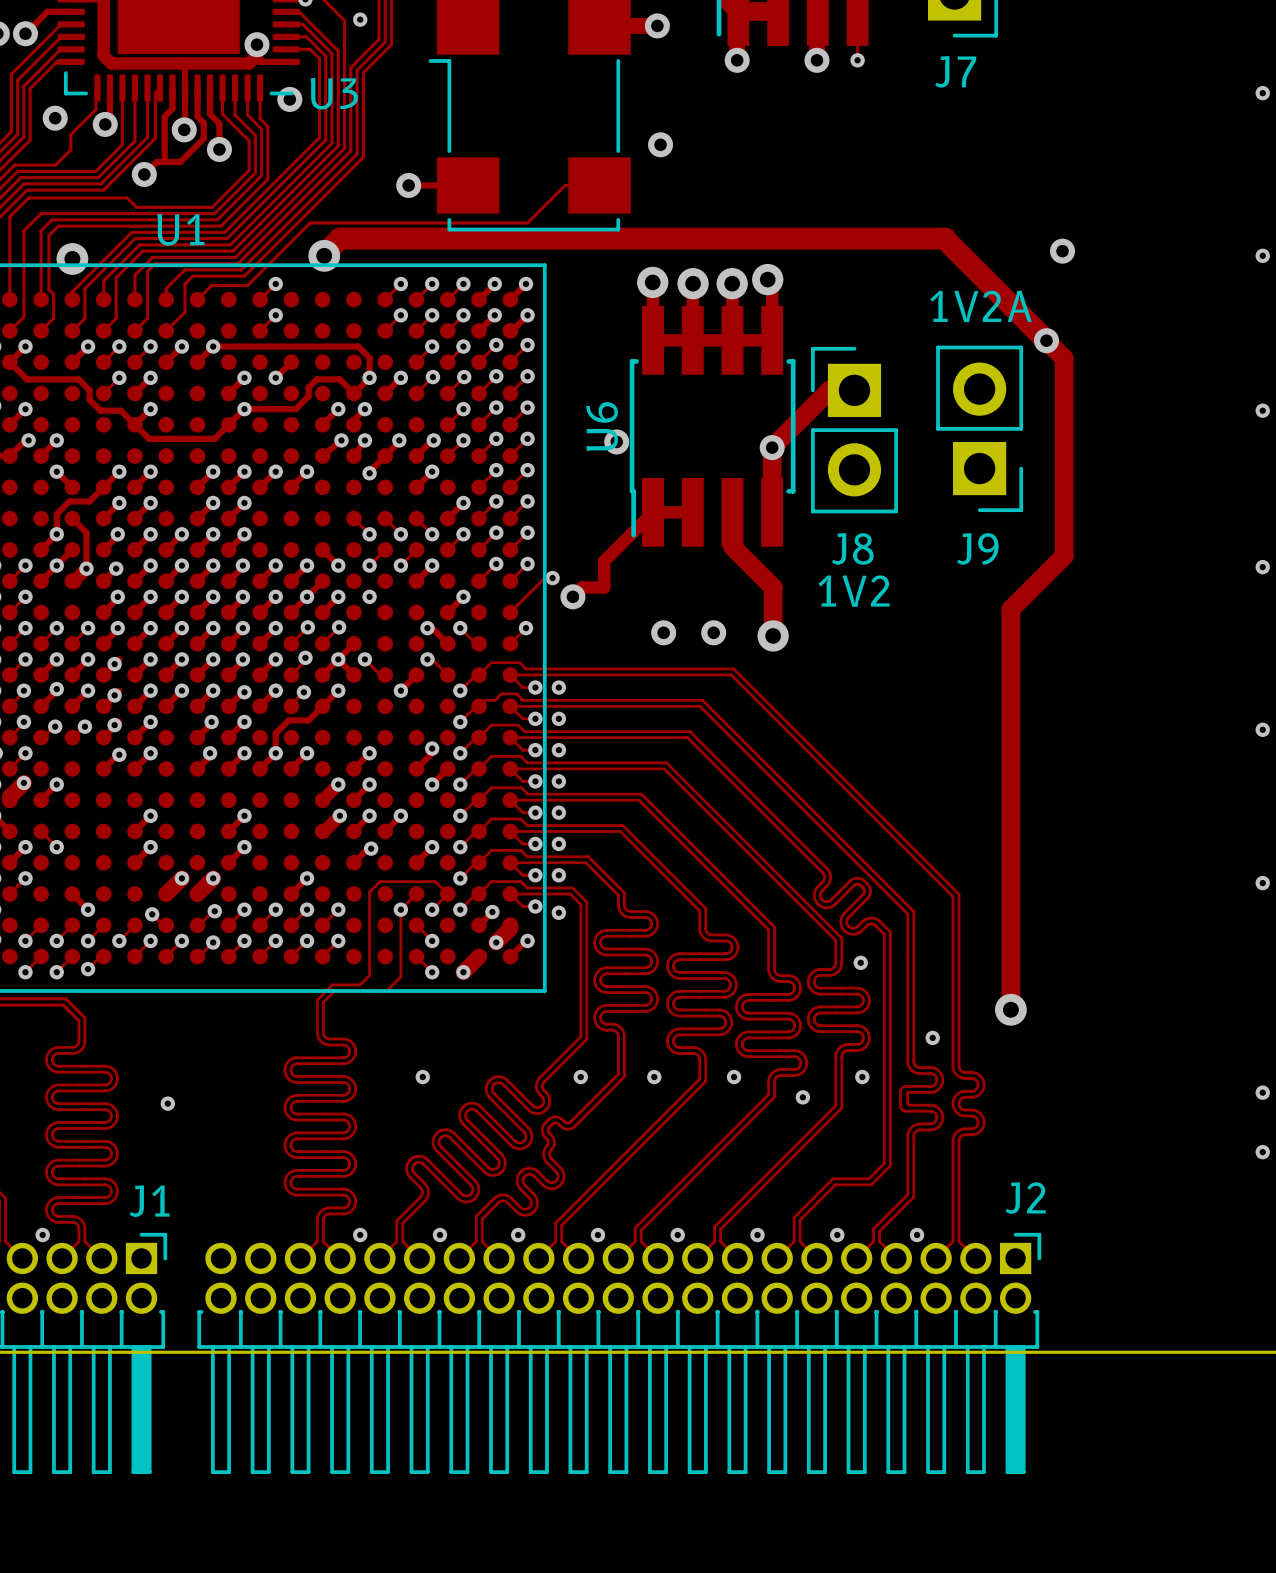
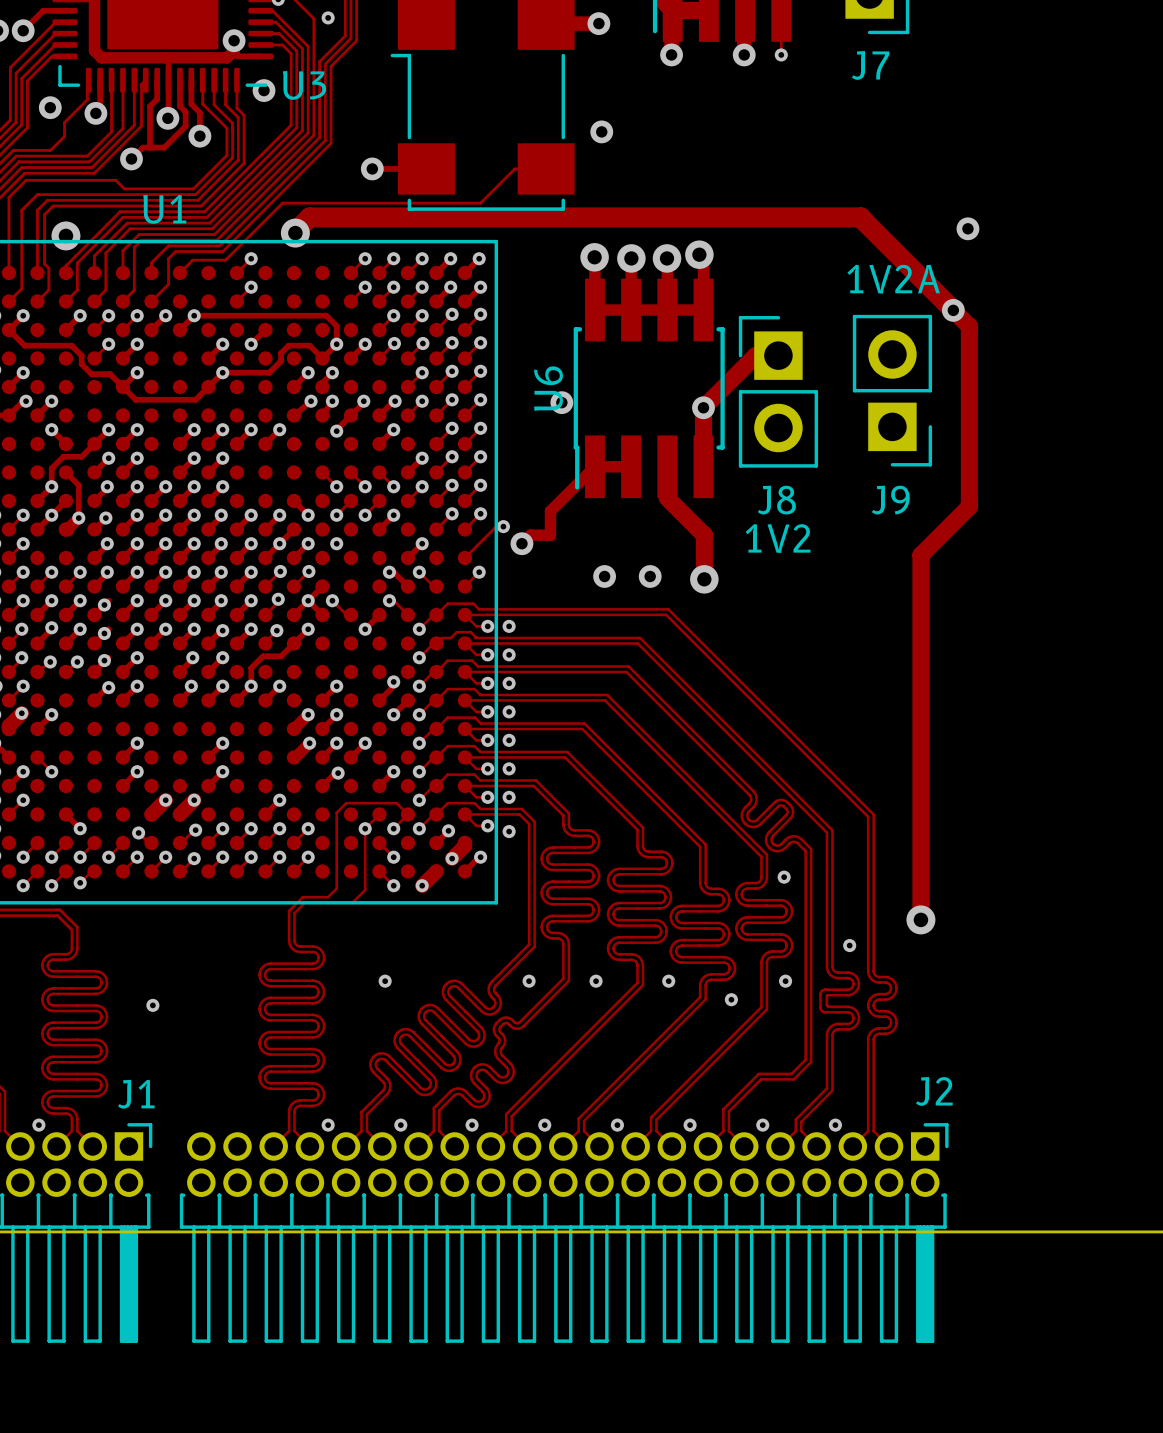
via: (1262, 93) -> none
via: (1262, 255) -> none
via: (1262, 410) -> none
via: (1262, 567) -> none
via: (1262, 729) -> none
via: (1262, 883) -> none
via: (1262, 1092) -> none
via: (1262, 1152) -> none

